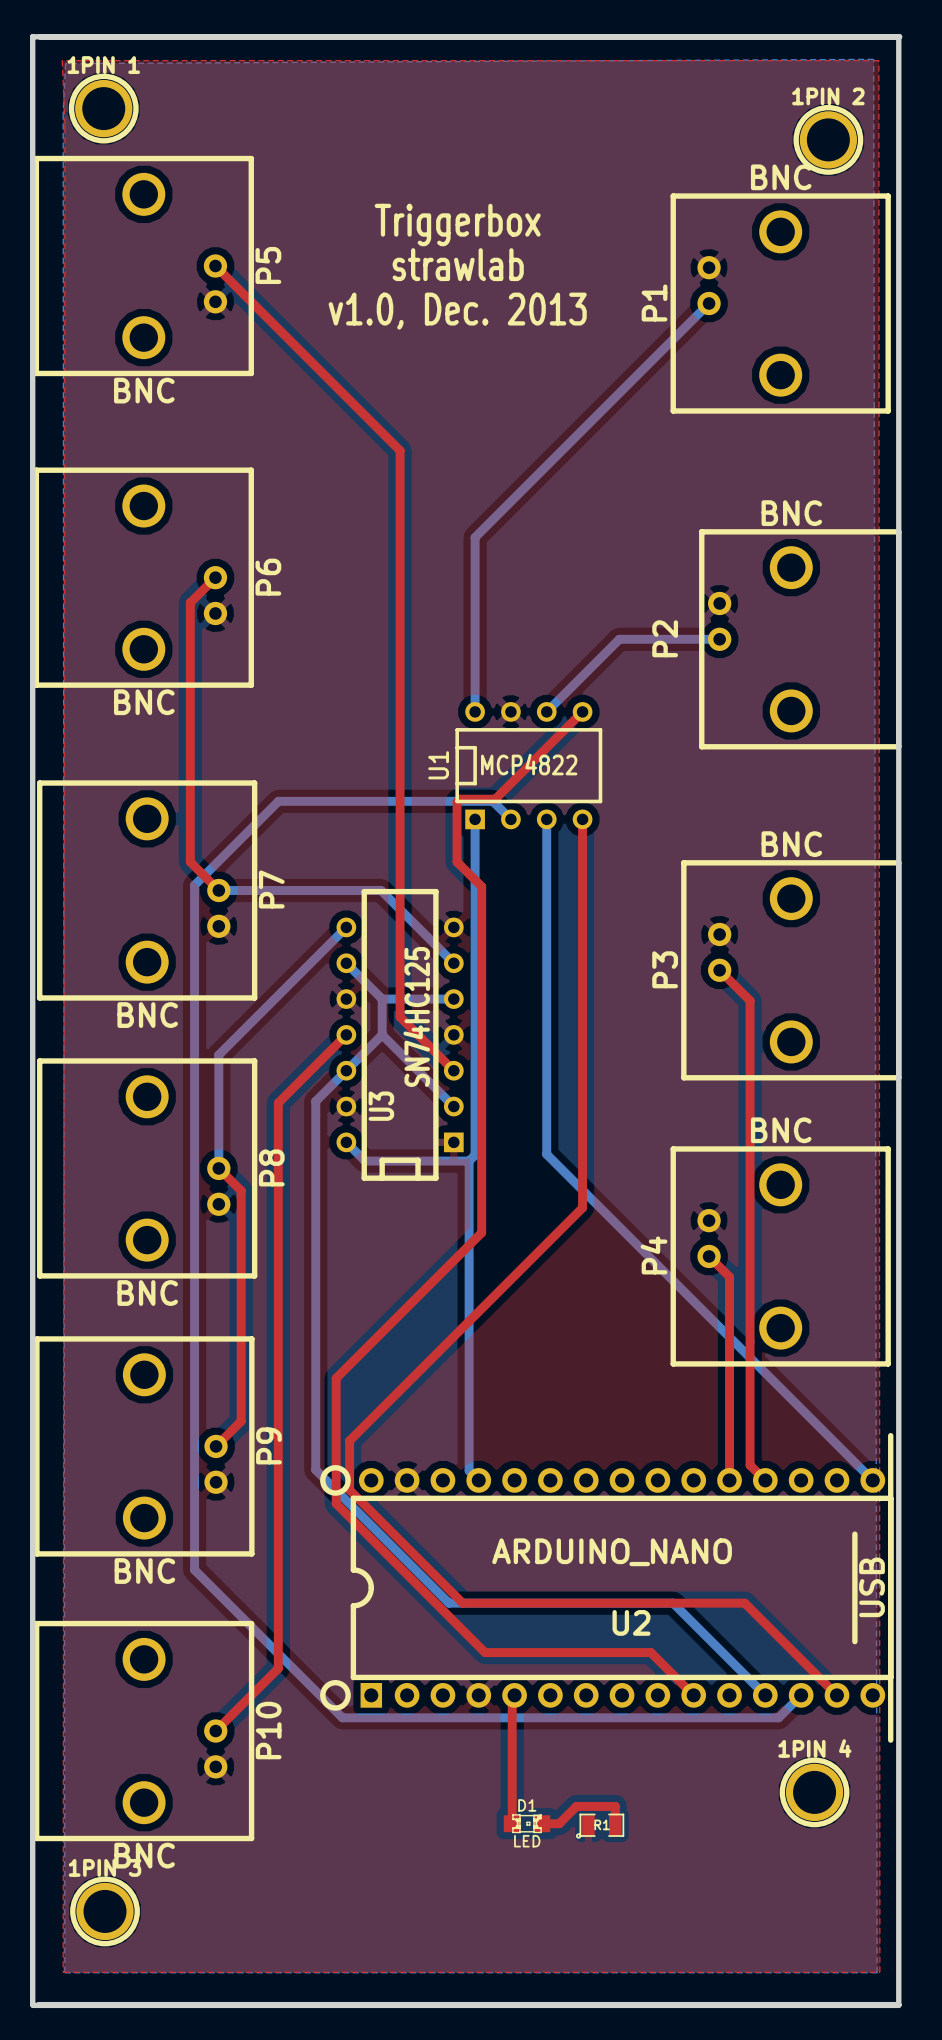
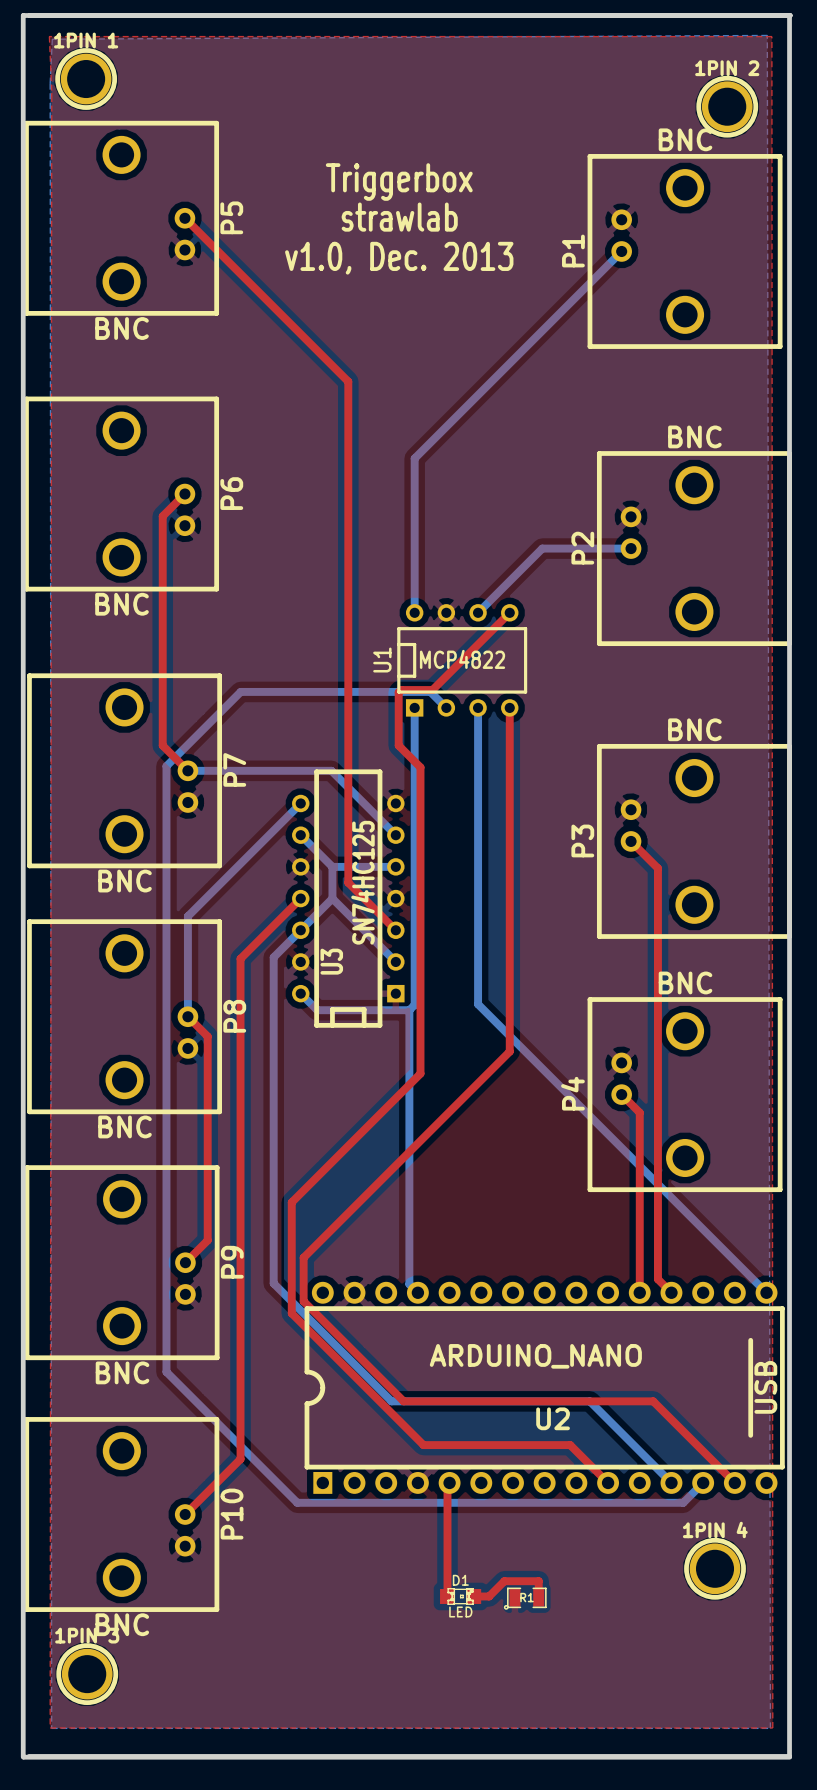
P2 footprint: [699, 529, 902, 750] -> [596, 451, 792, 647]
U2 footprint: [320, 1432, 894, 1743] -> [304, 1281, 785, 1494]

